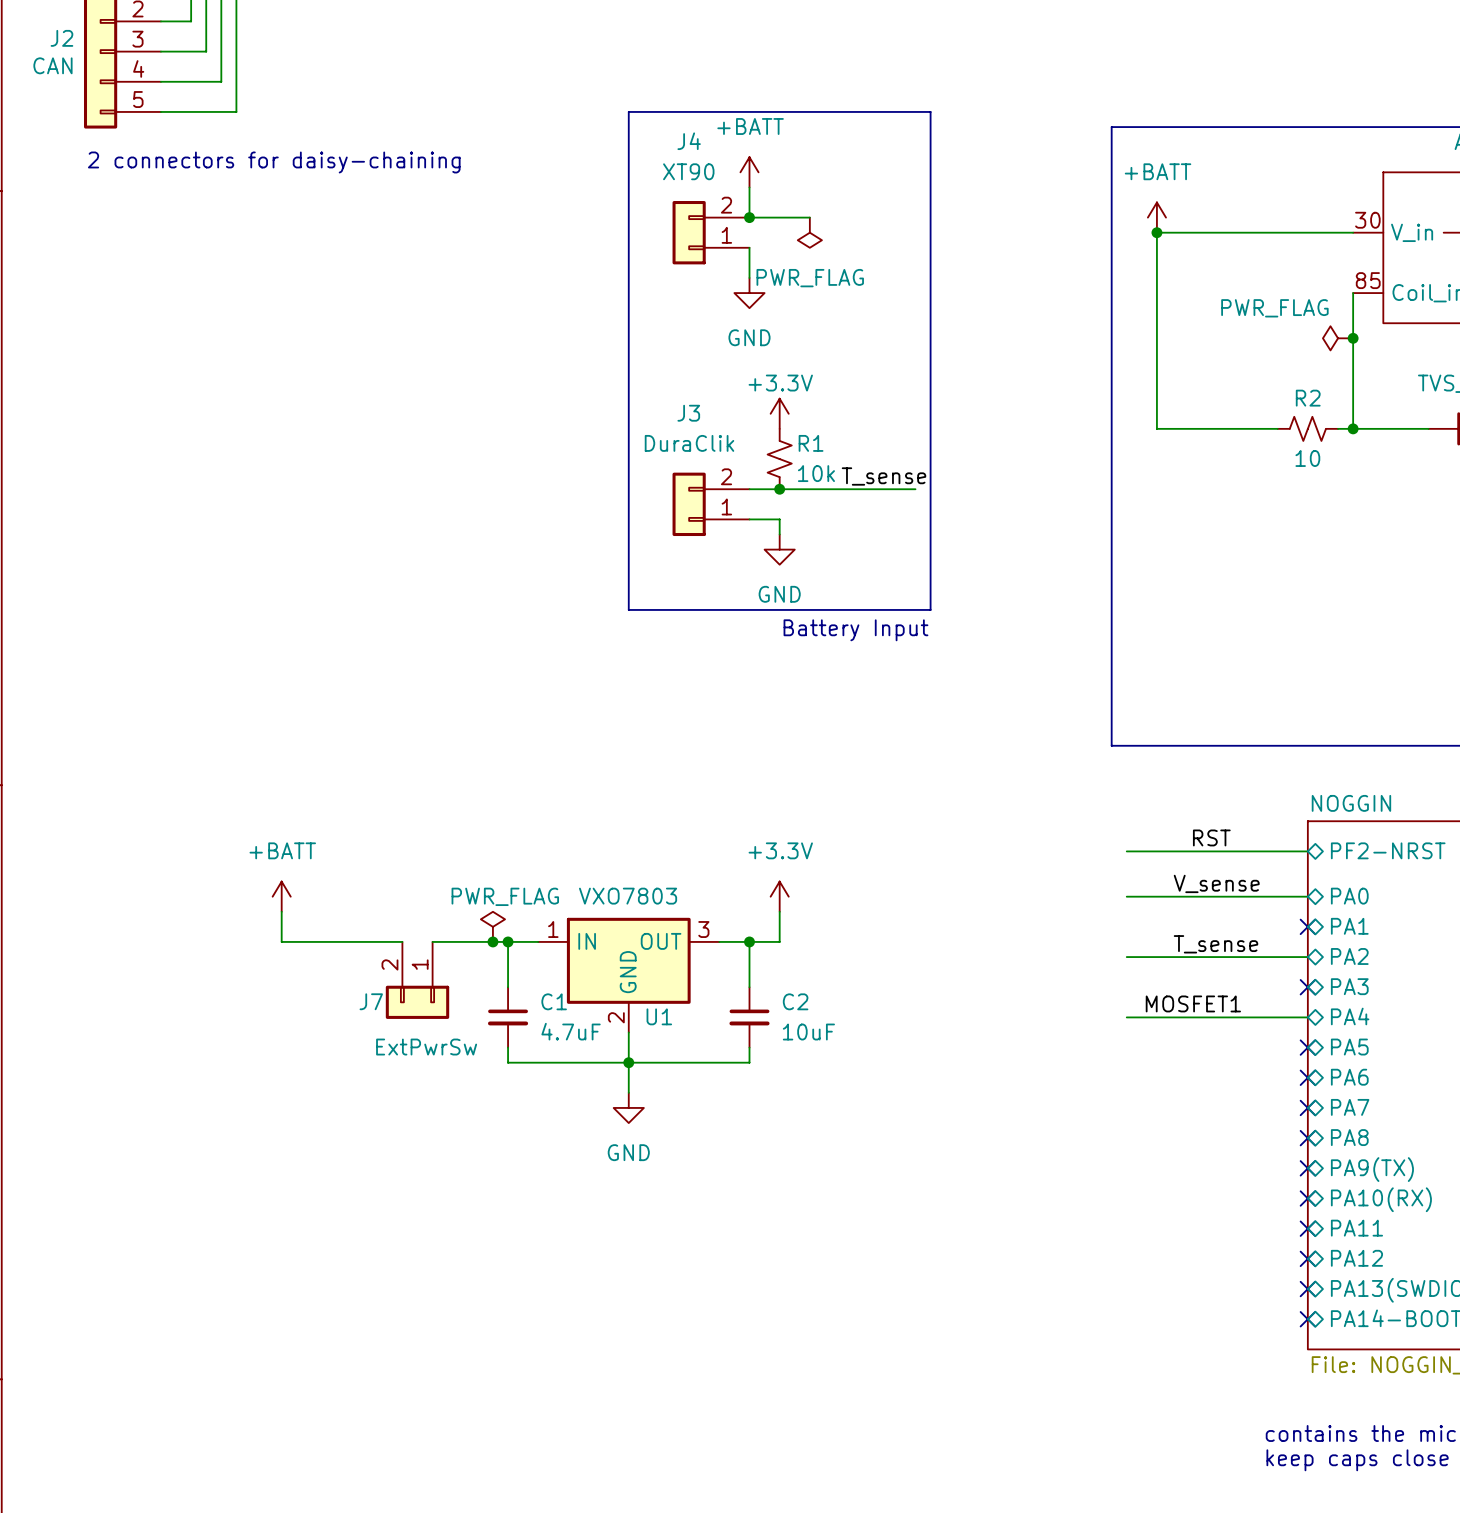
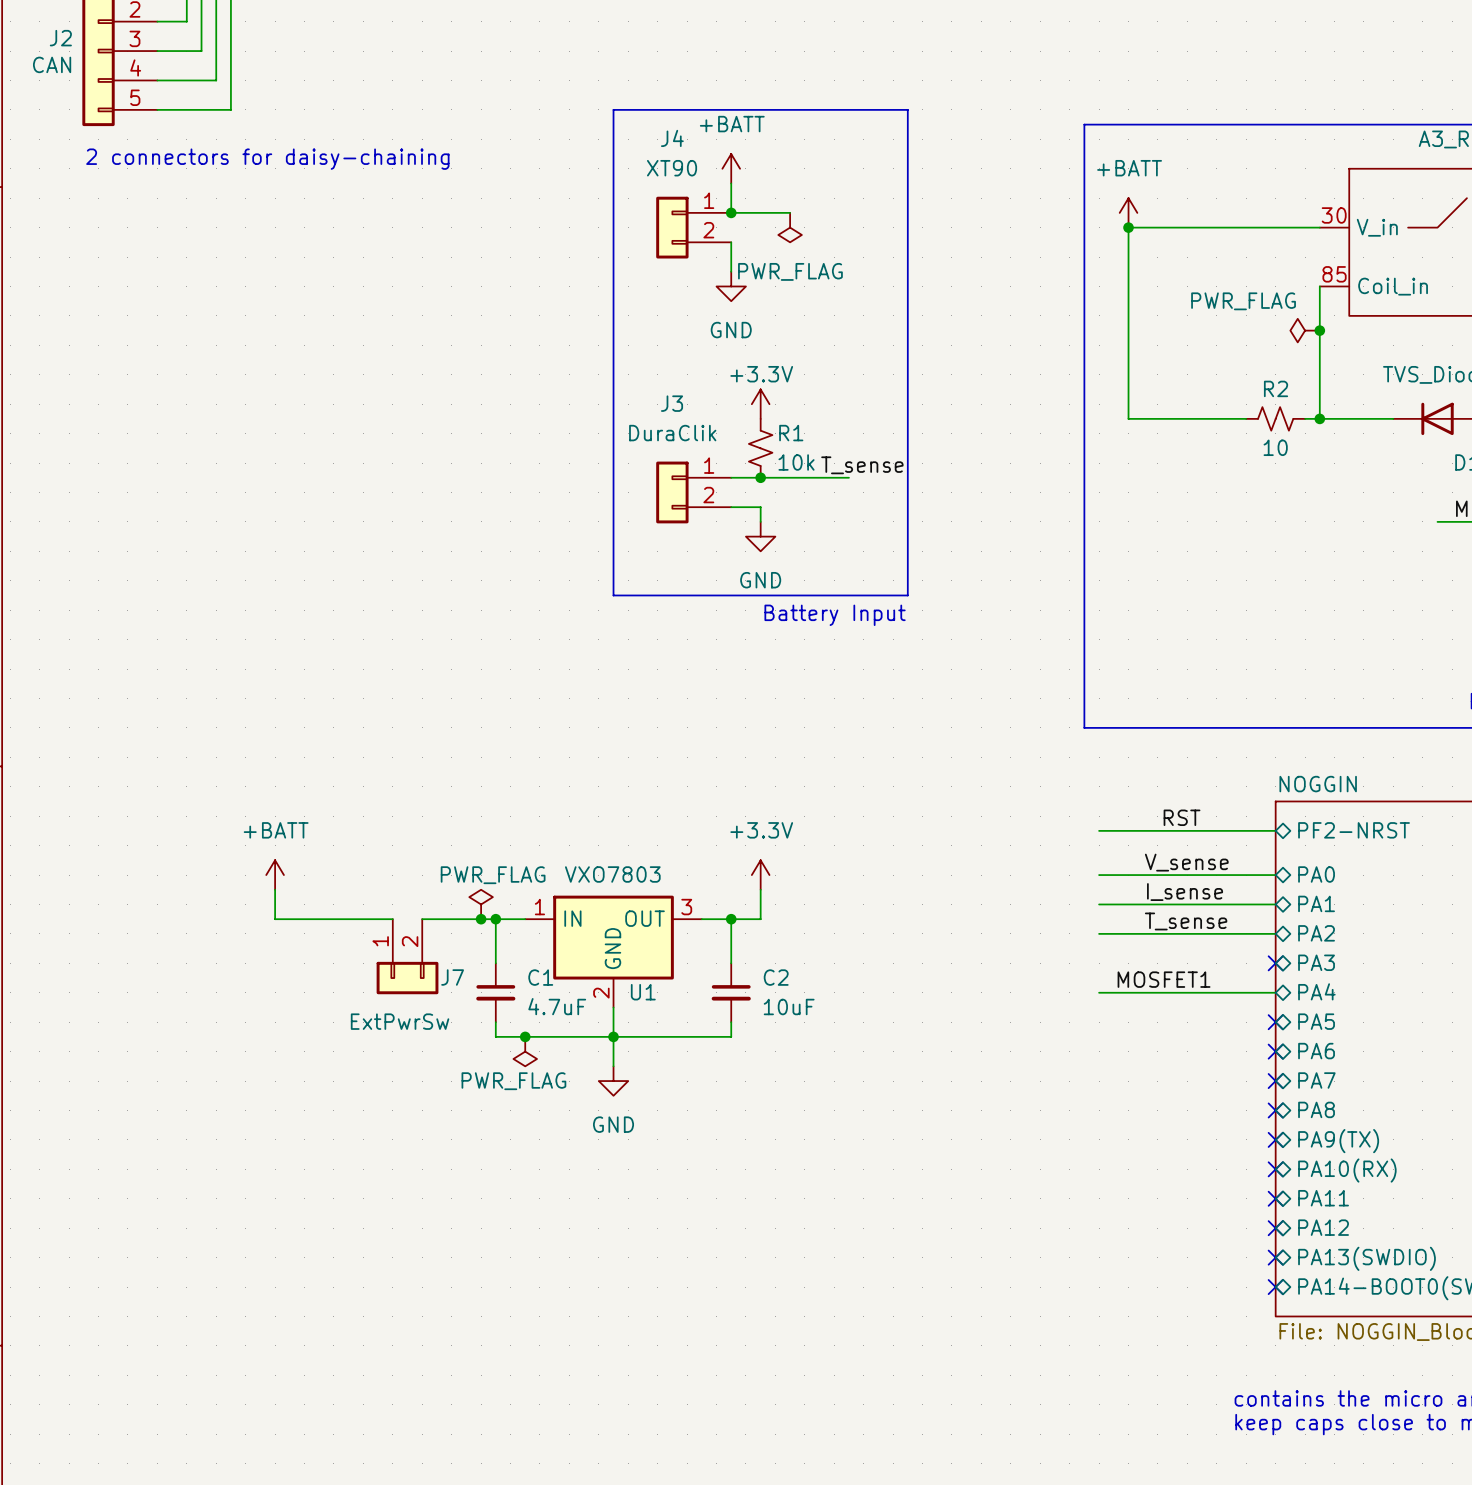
J4 flip: as is (689, 232) -> up-down (672, 227)
wire: (870, 489) (915, 489) -> none
J3 flip: as is (689, 504) -> up-down (672, 492)
label: none -> I_sense (1185, 892)
wire: none -> (1099, 904) (1275, 904)
no-connect mark: (1307, 926) -> none
J7 flip: as is (417, 1002) -> left-right (407, 978)
junction: none -> (525, 1036)
power symbol: none -> PWR_FLAG (525, 1051)

